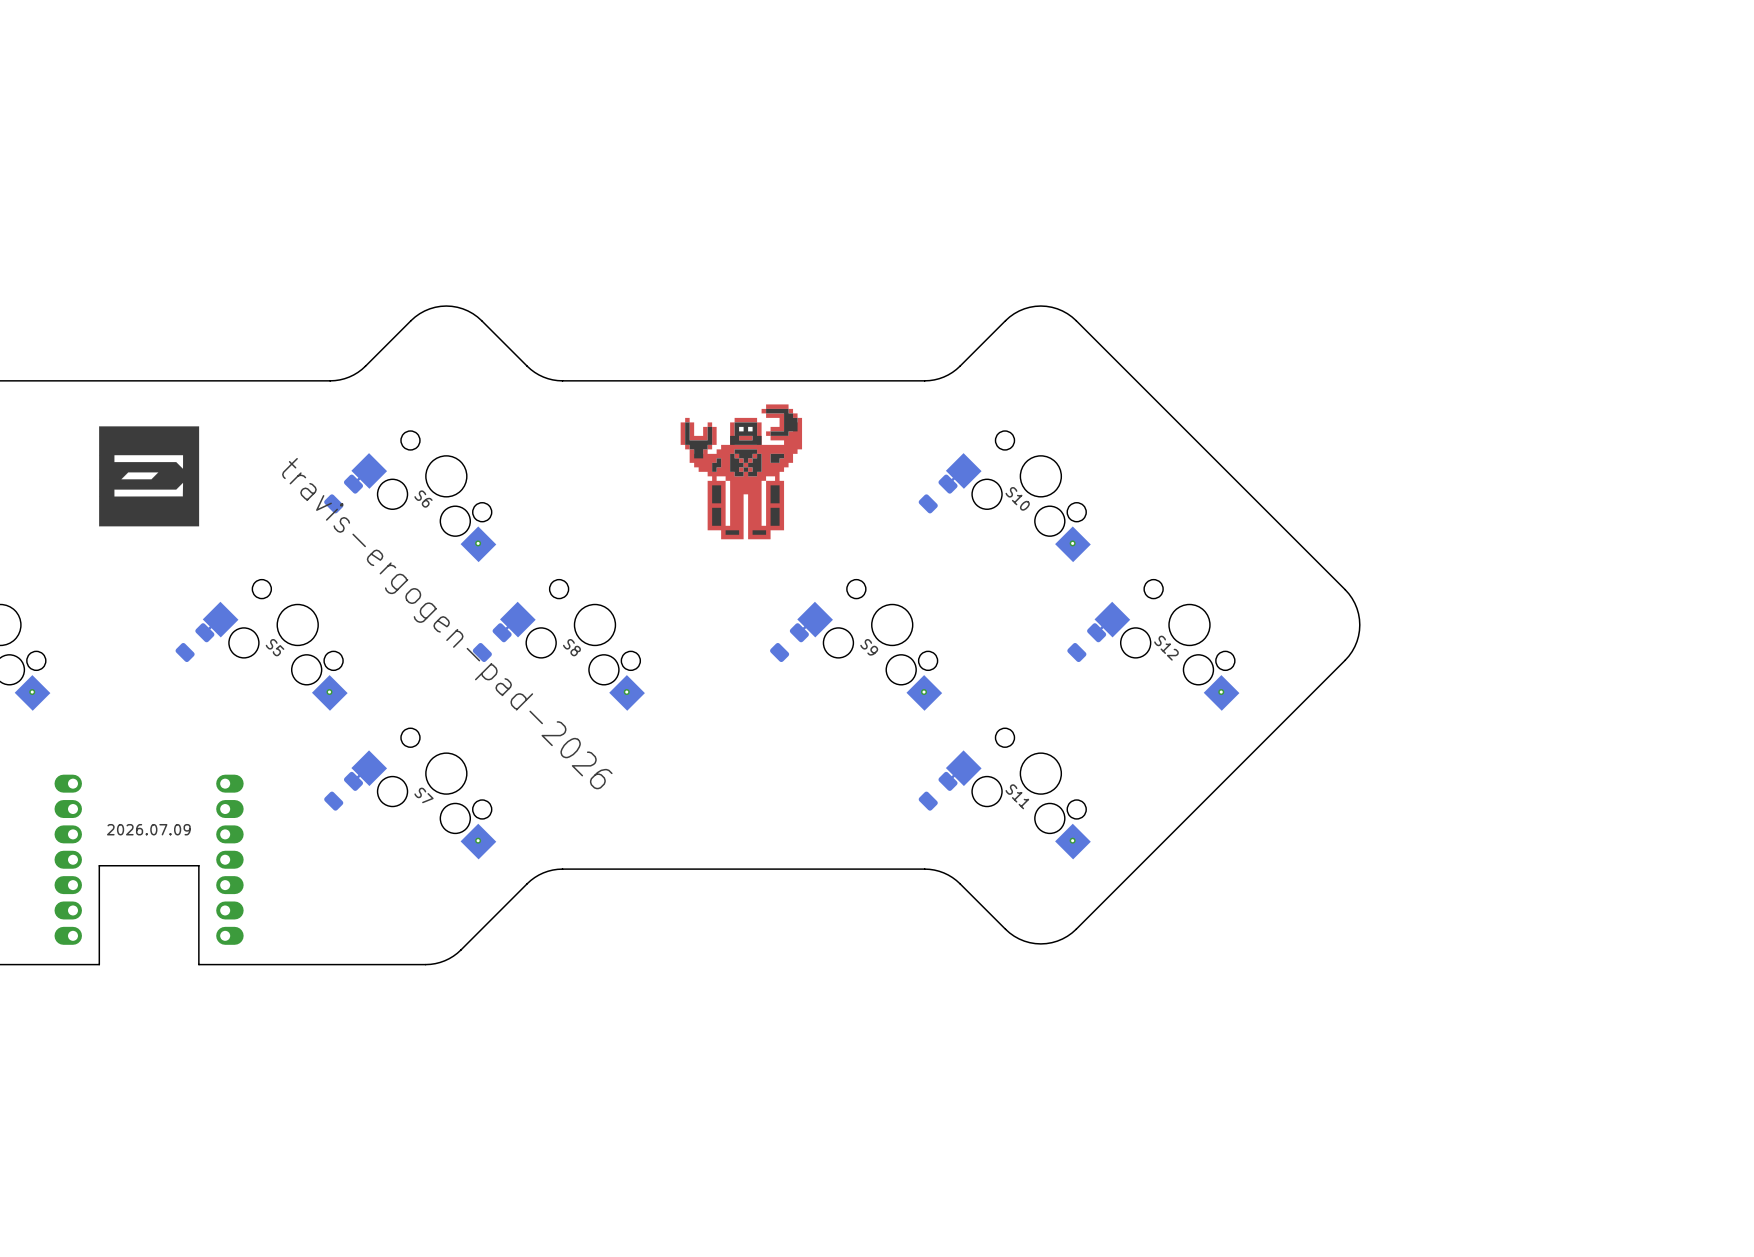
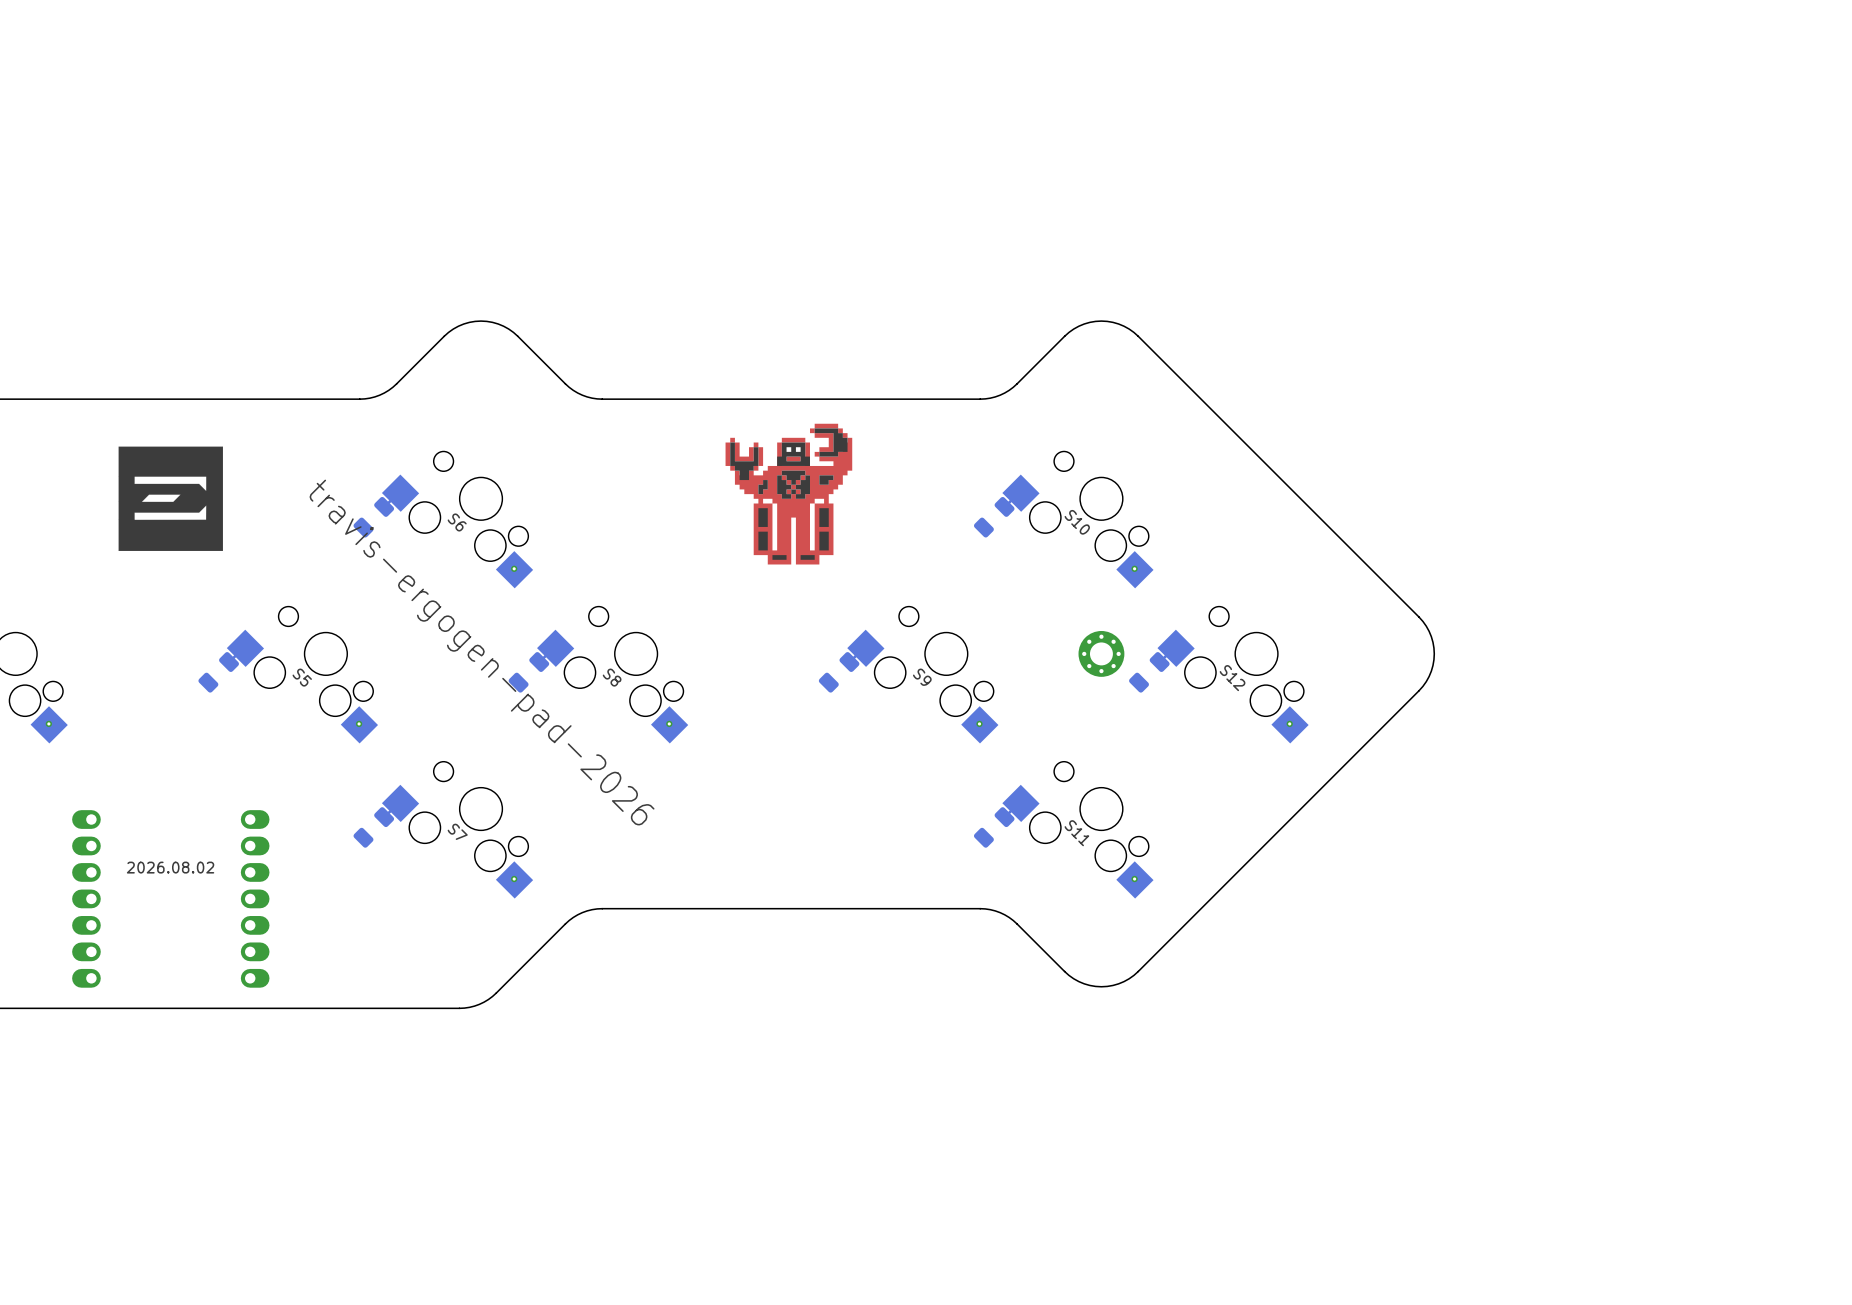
part: none -> (1101, 653)
text: 2026.07.09 (148, 829) -> 2026.08.02 (170, 867)
board edge: (99, 964) (99, 865) (198, 865) (198, 964) -> (118, 1008) (222, 1008)

